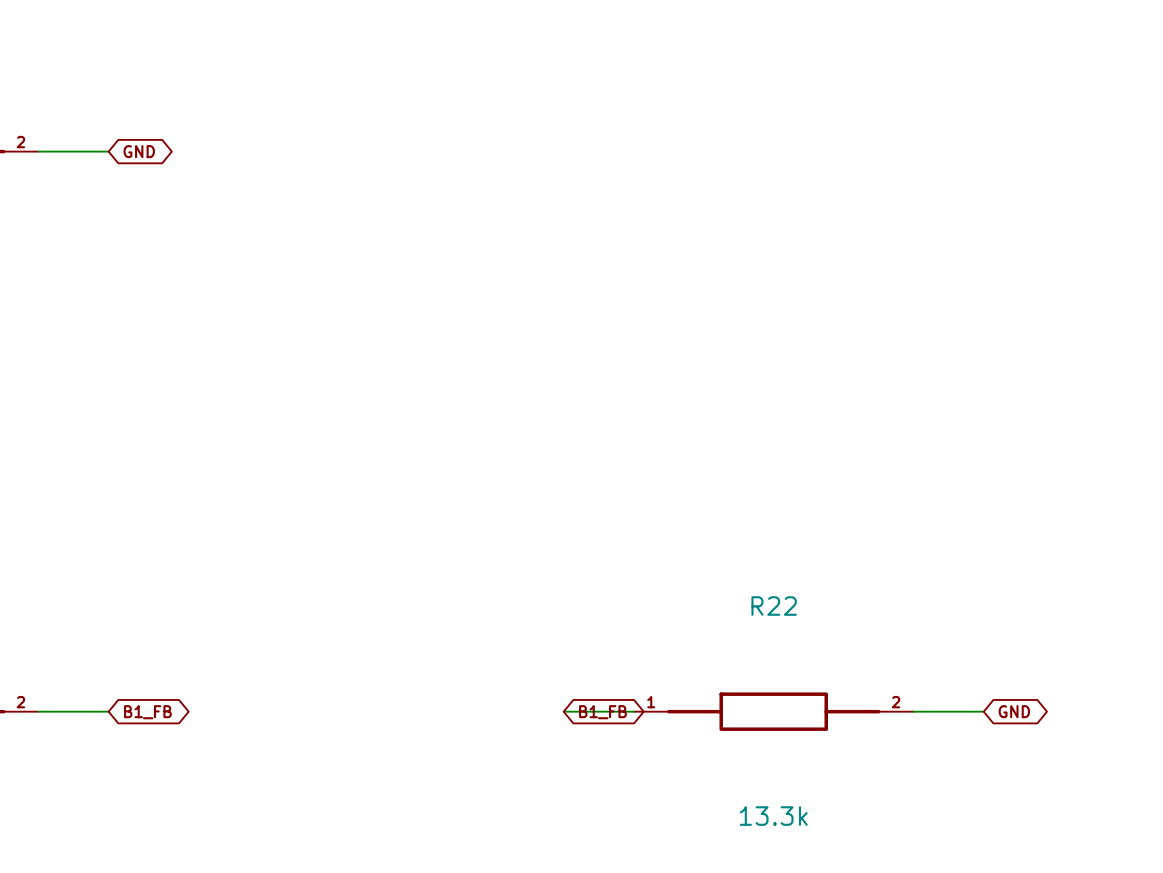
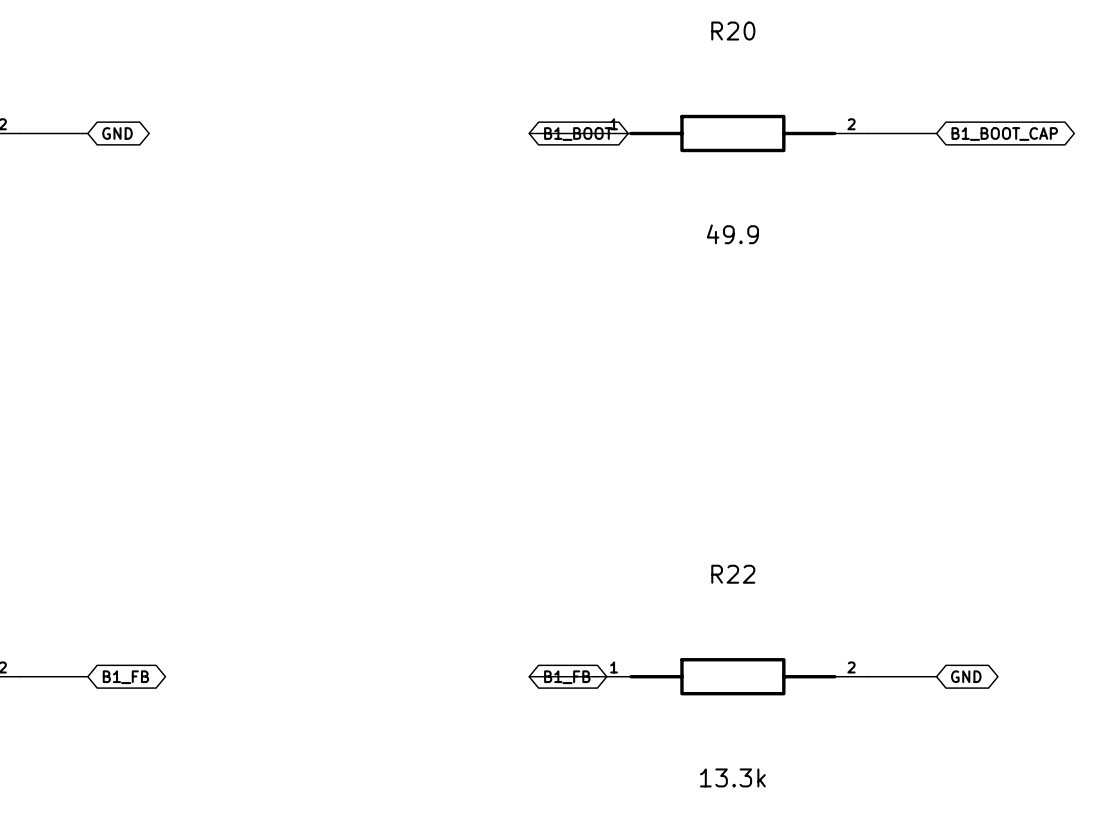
wire: none -> (529, 133) (597, 133)
R20: none -> 49.9 (732, 133)
wire: none -> (868, 133) (936, 133)
global label: none -> B1_BOOT (578, 134)
global label: none -> B1_BOOT_CAP (1004, 134)

